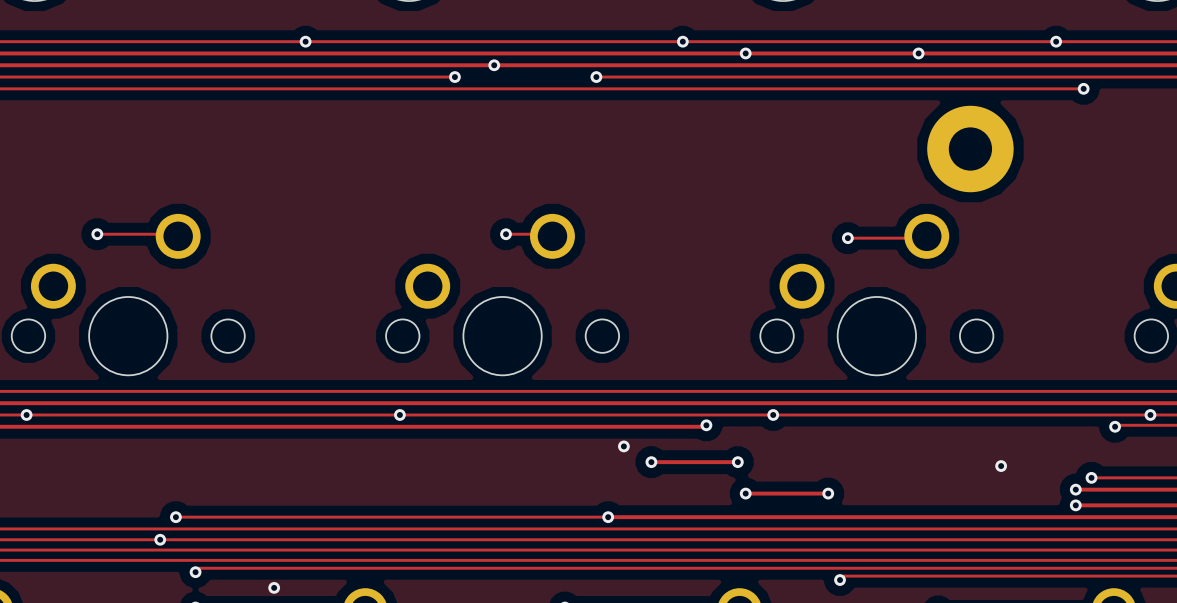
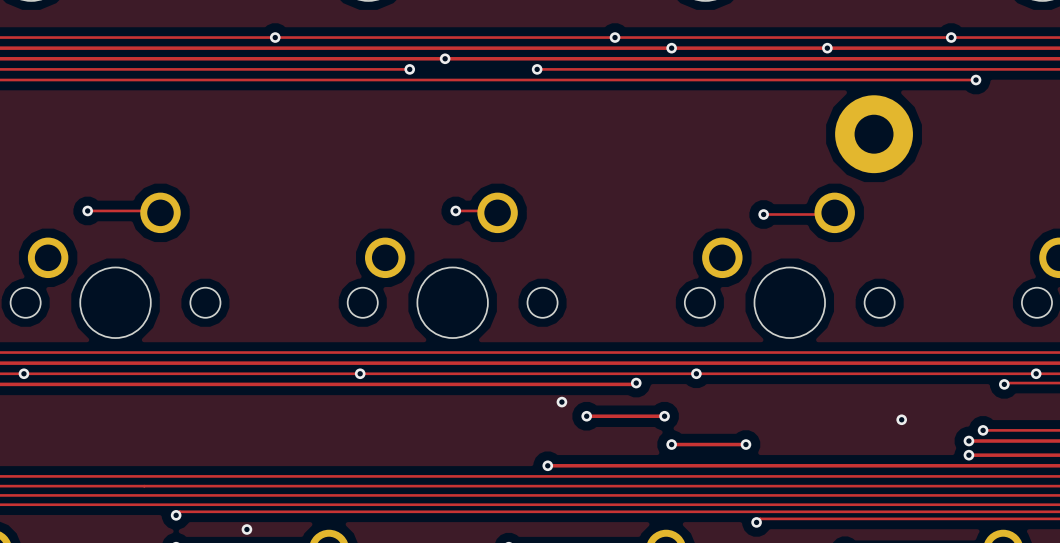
track: (175, 517) (608, 517) -> none
via: (175, 517) -> none
via: (160, 539) -> none

